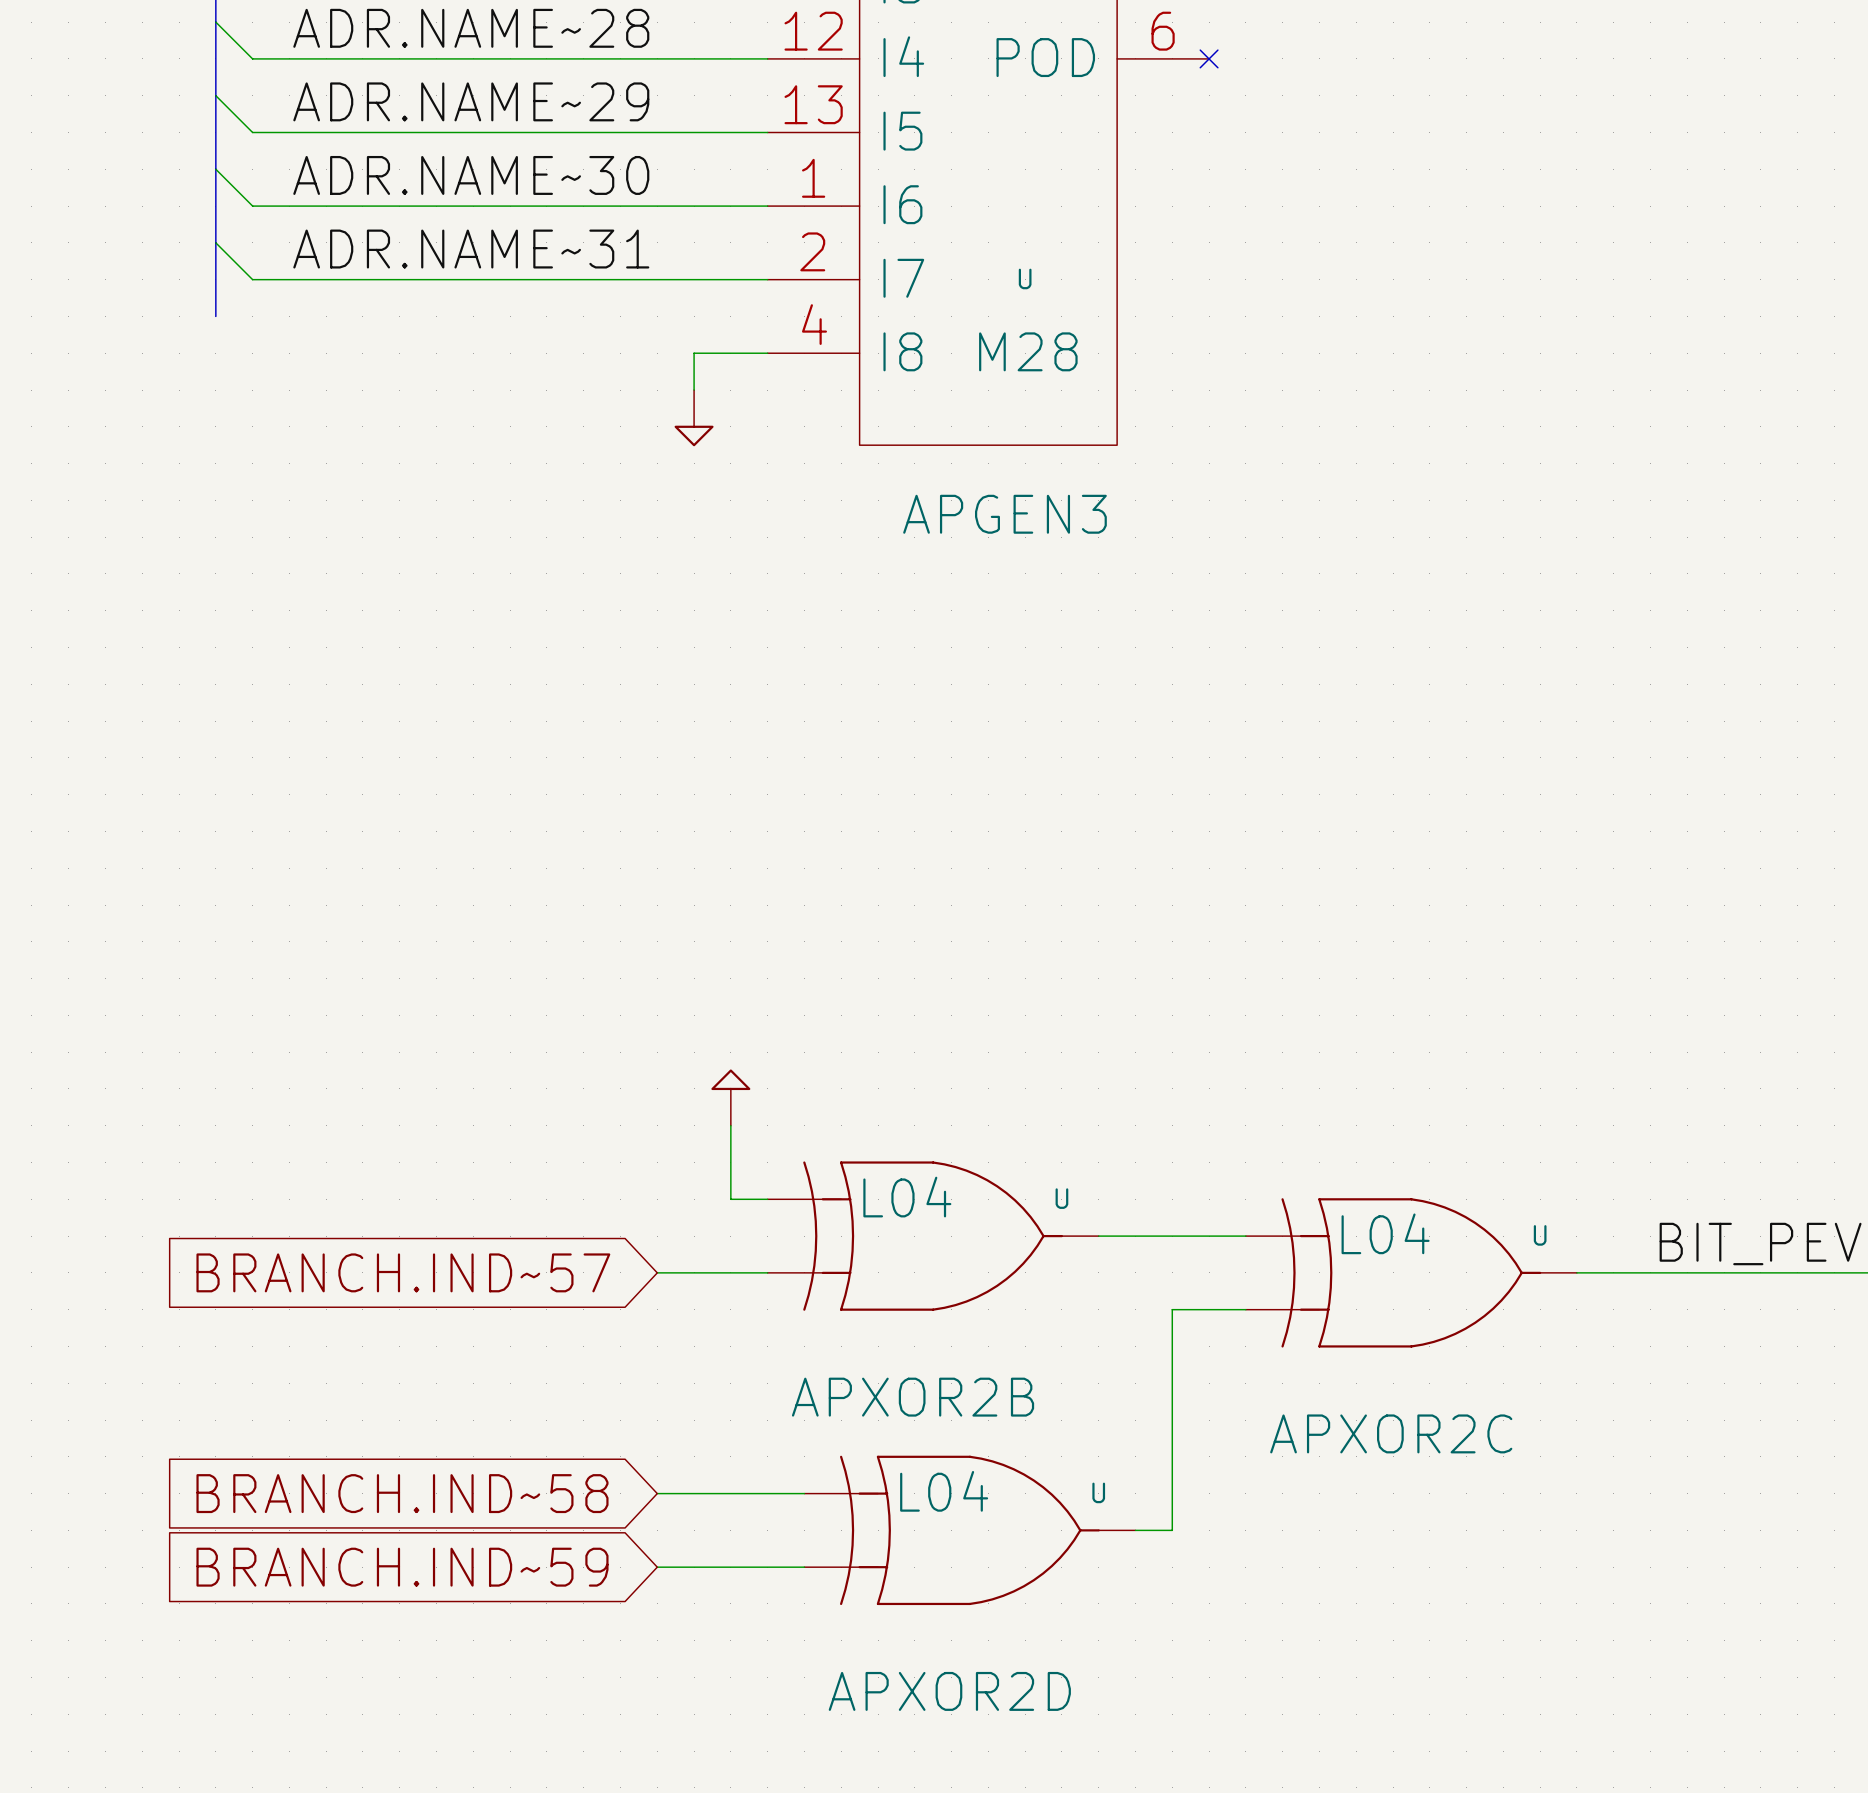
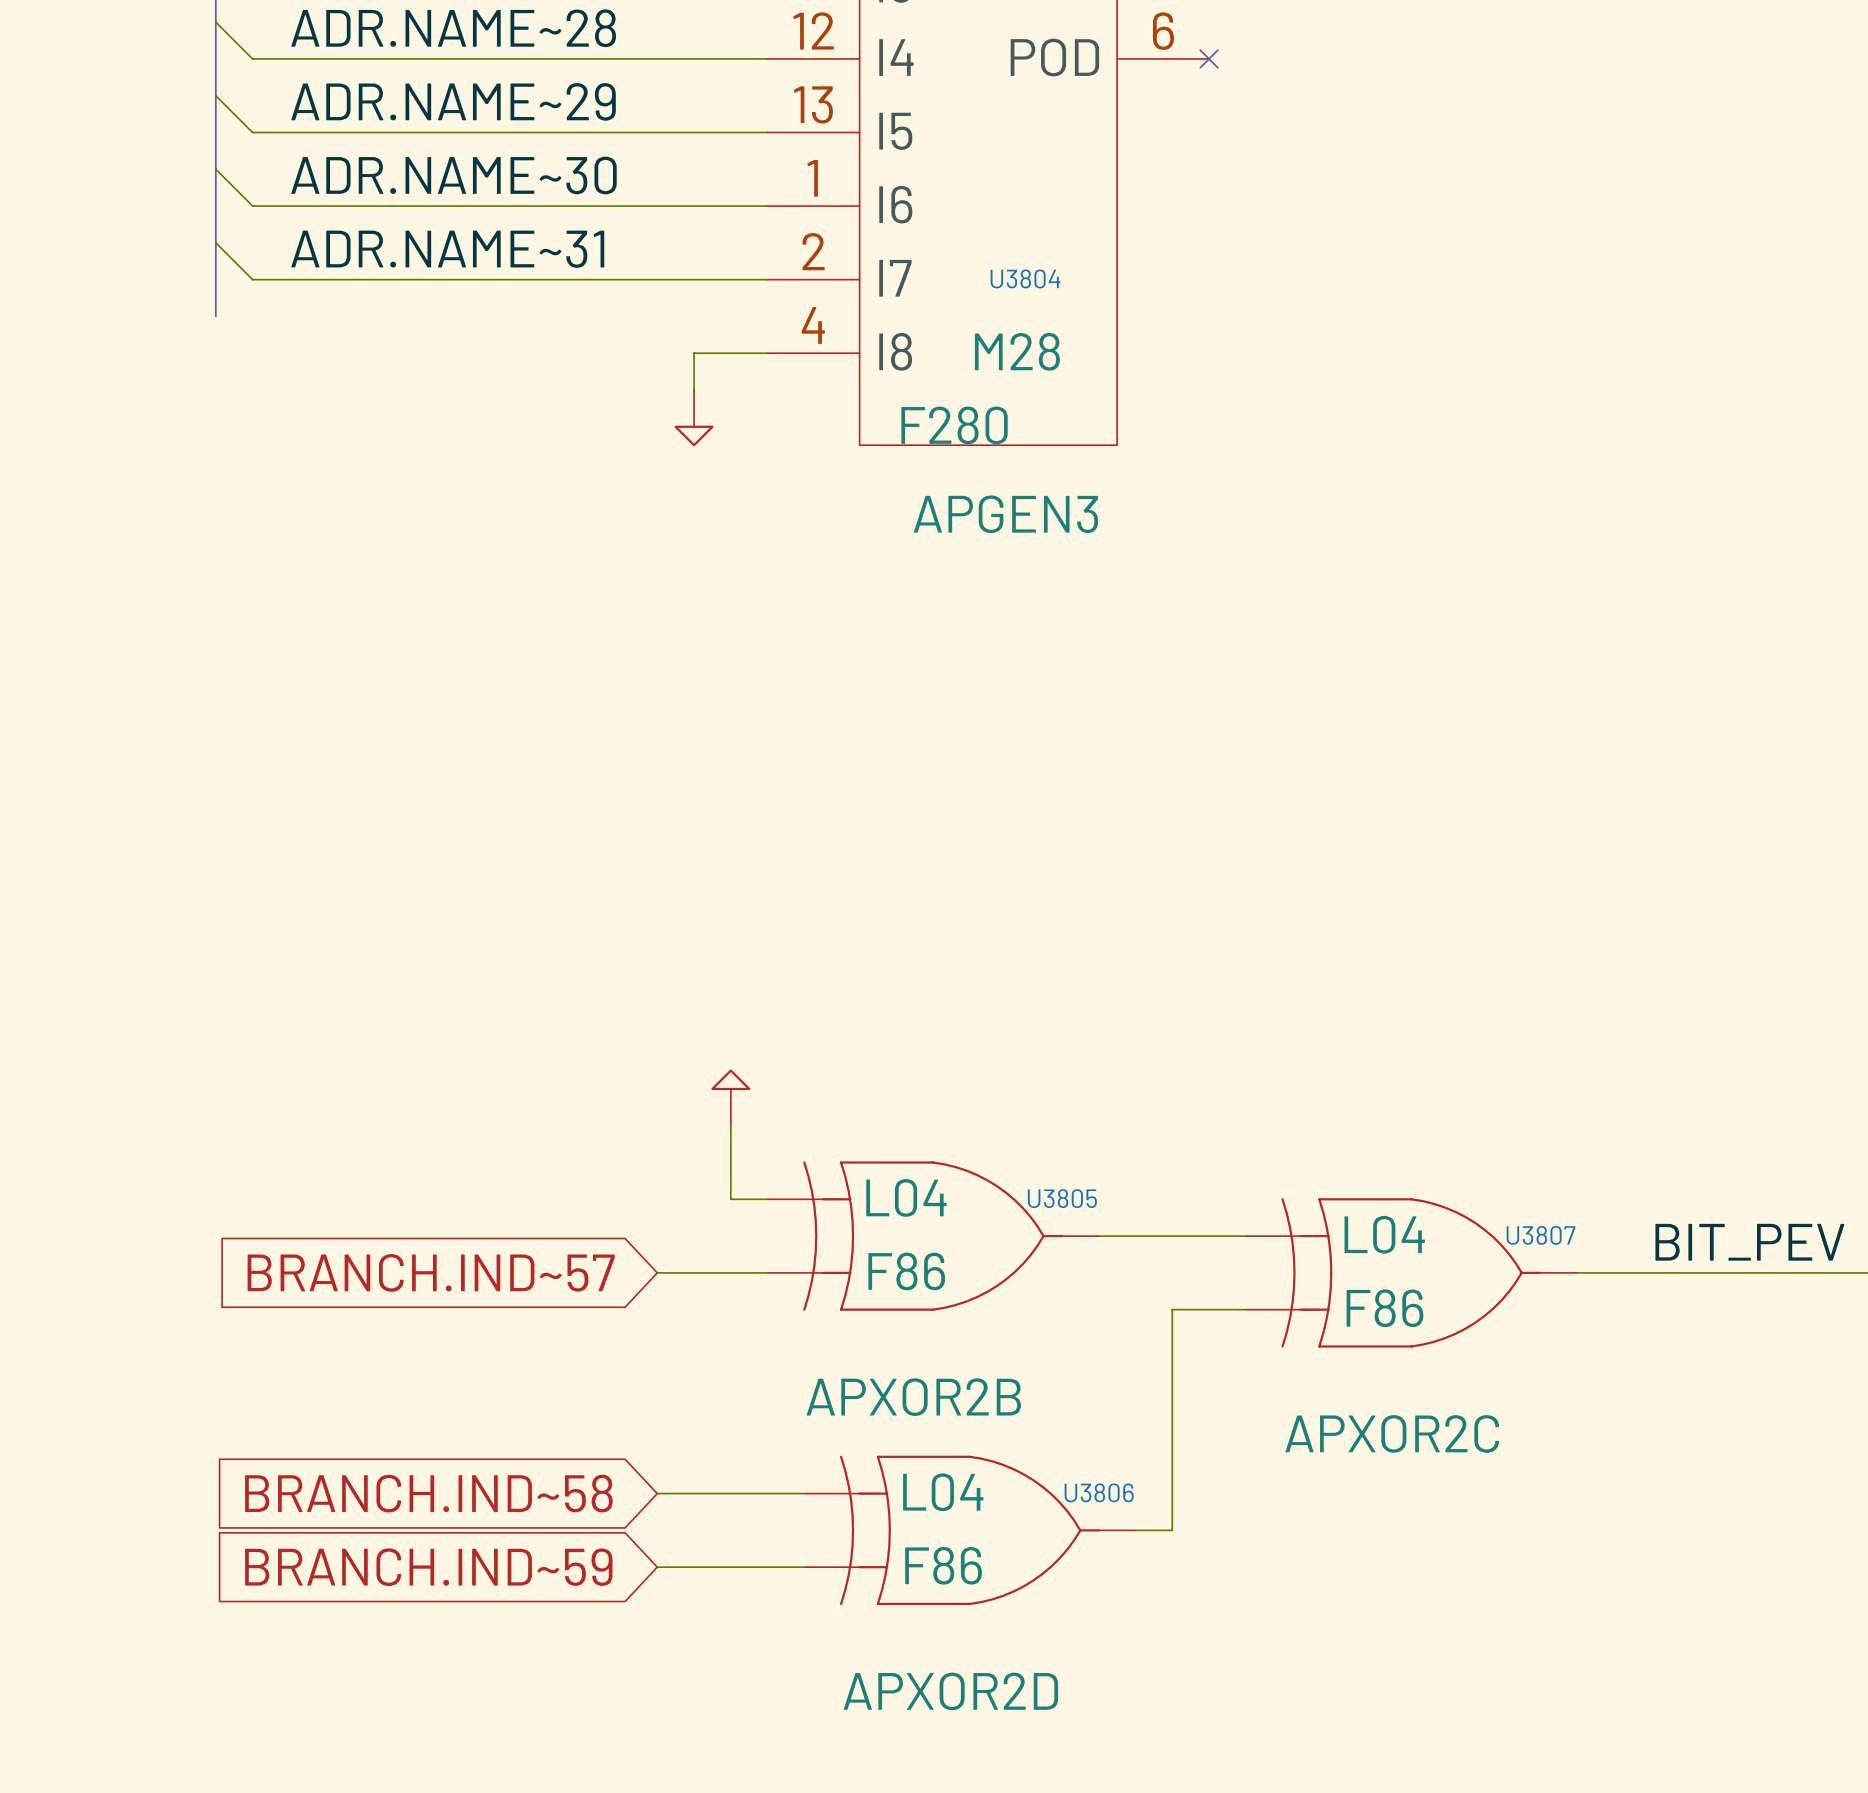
U name: U (1025, 278) -> U3804 (1025, 278)
U value: none -> F280 (954, 425)
U name: U (1061, 1198) -> U3805 (1062, 1198)
U name: U (1540, 1235) -> U3807 (1540, 1235)
U value: none -> F86 (906, 1271)
U value: none -> F86 (1384, 1308)
U name: U (1098, 1492) -> U3806 (1099, 1492)
U value: none -> F86 (943, 1565)

